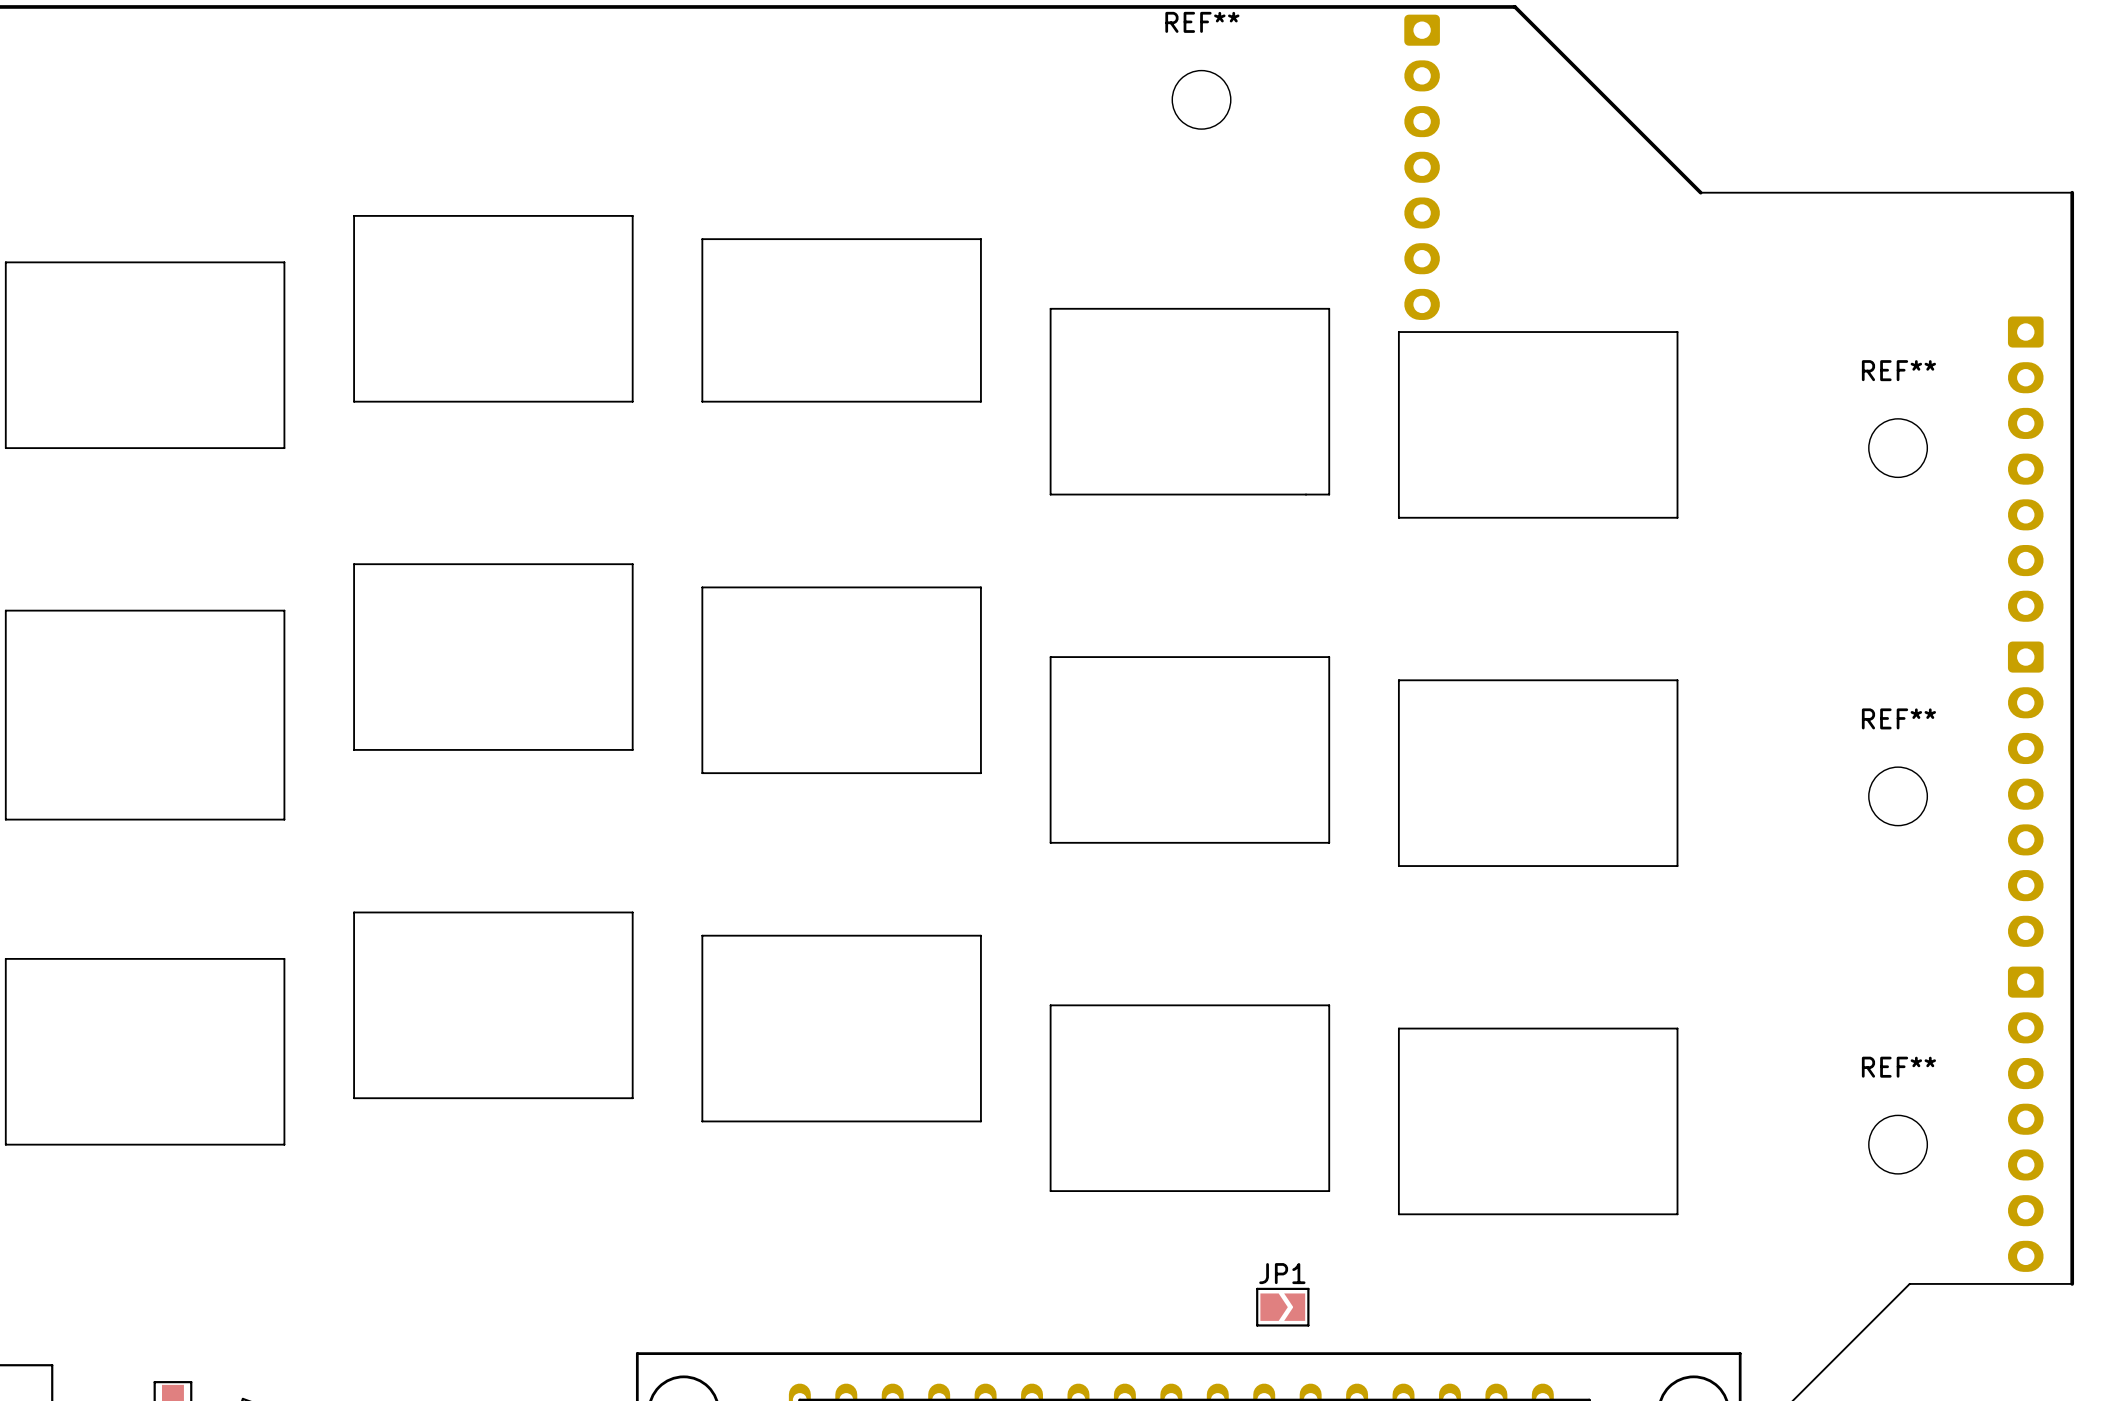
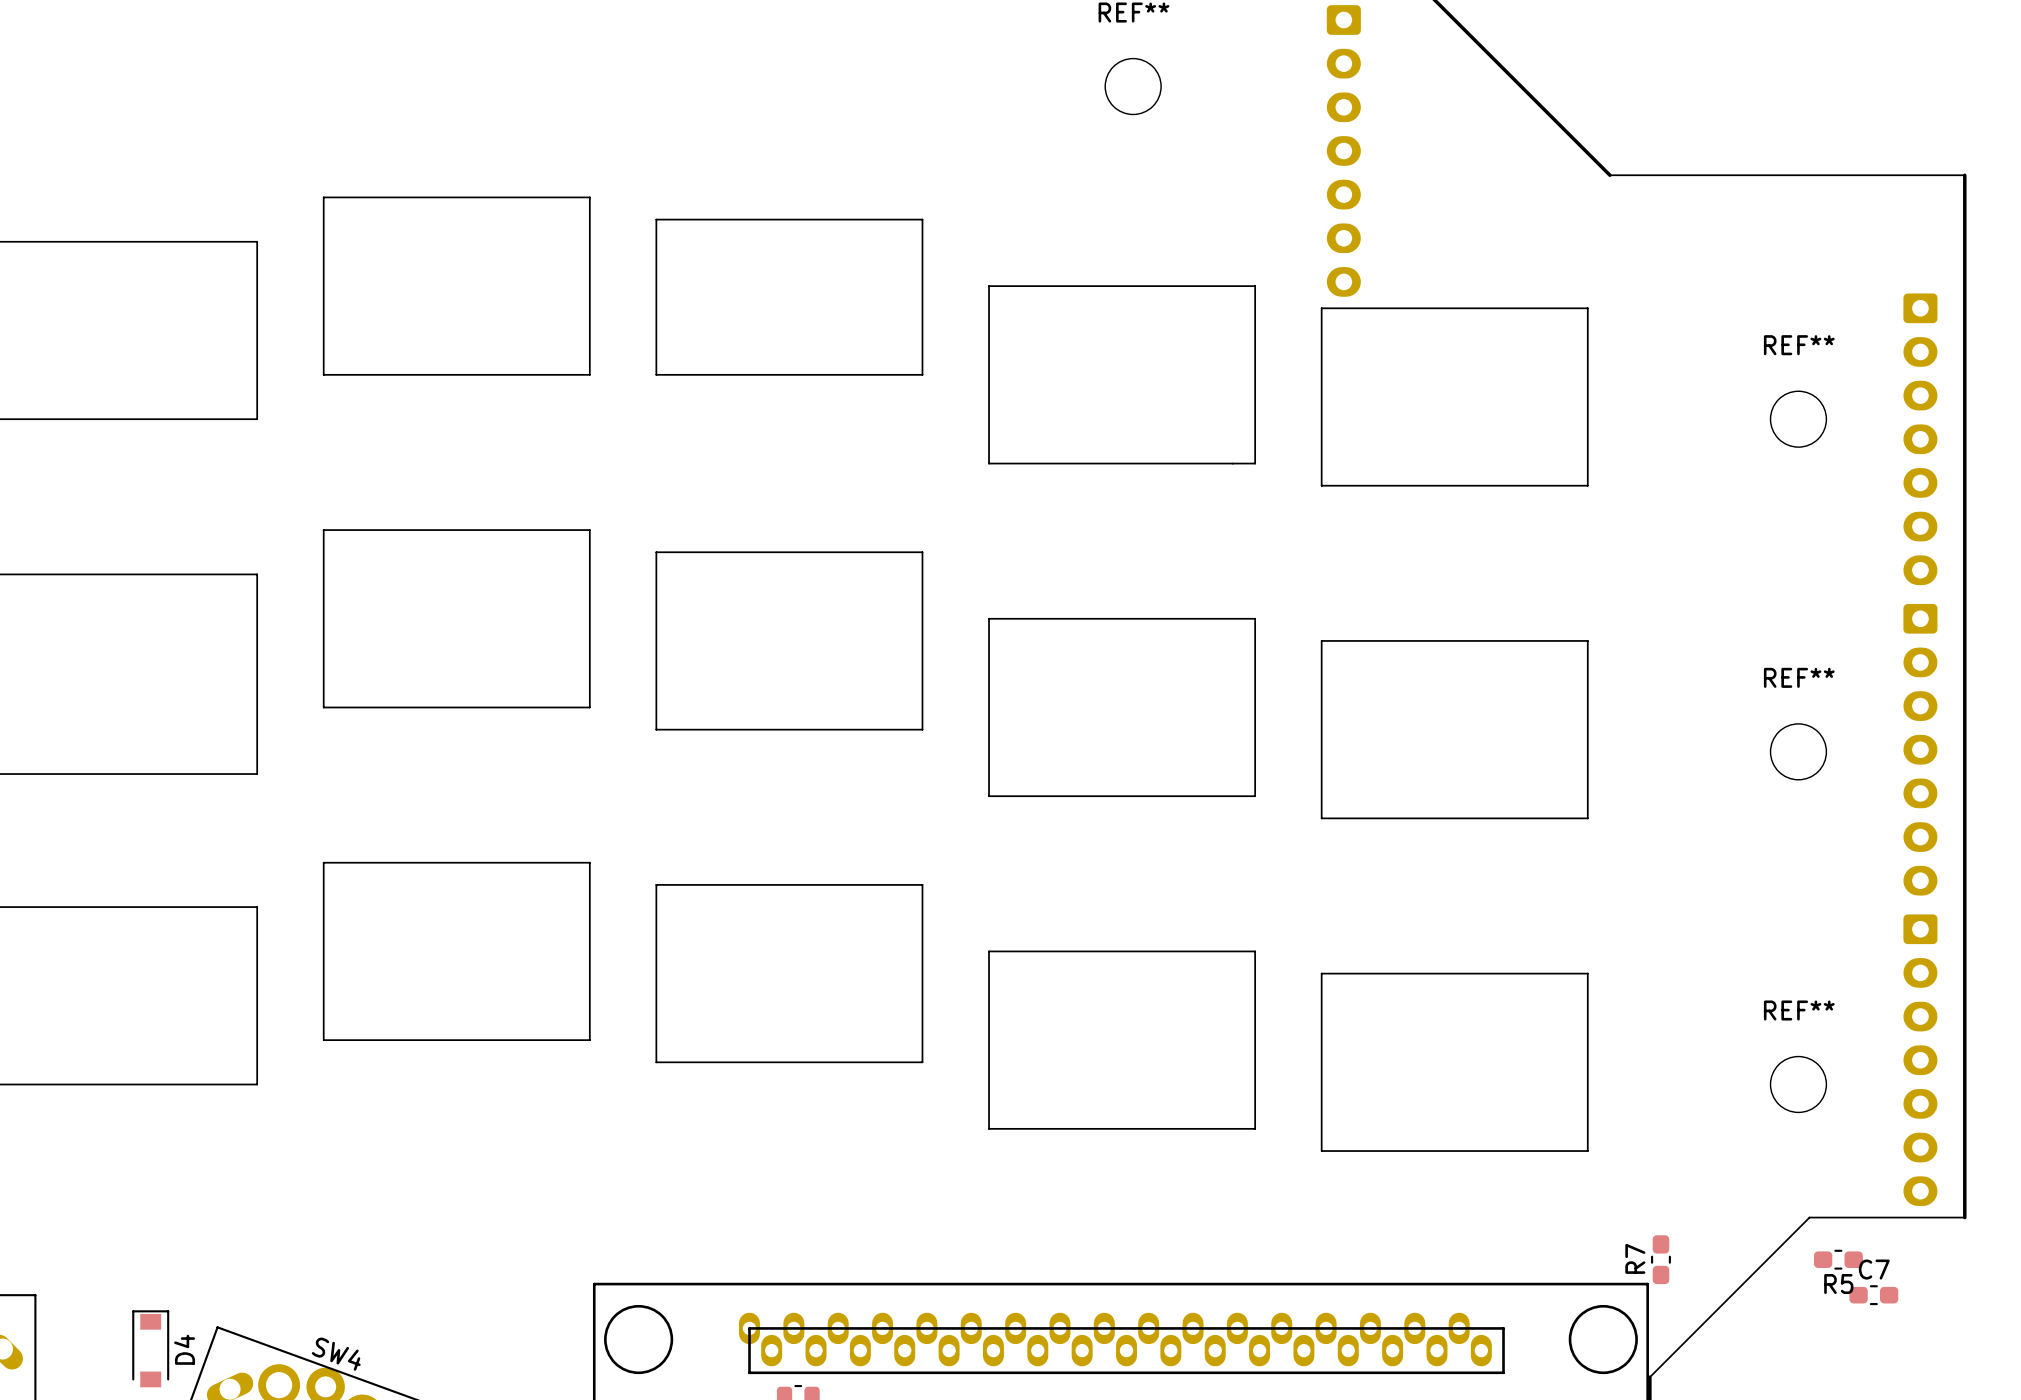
JP1: (1282, 1307) -> none
R7: none -> (1660, 1259)
R5: none -> (1838, 1259)
C7: none -> (1873, 1295)

